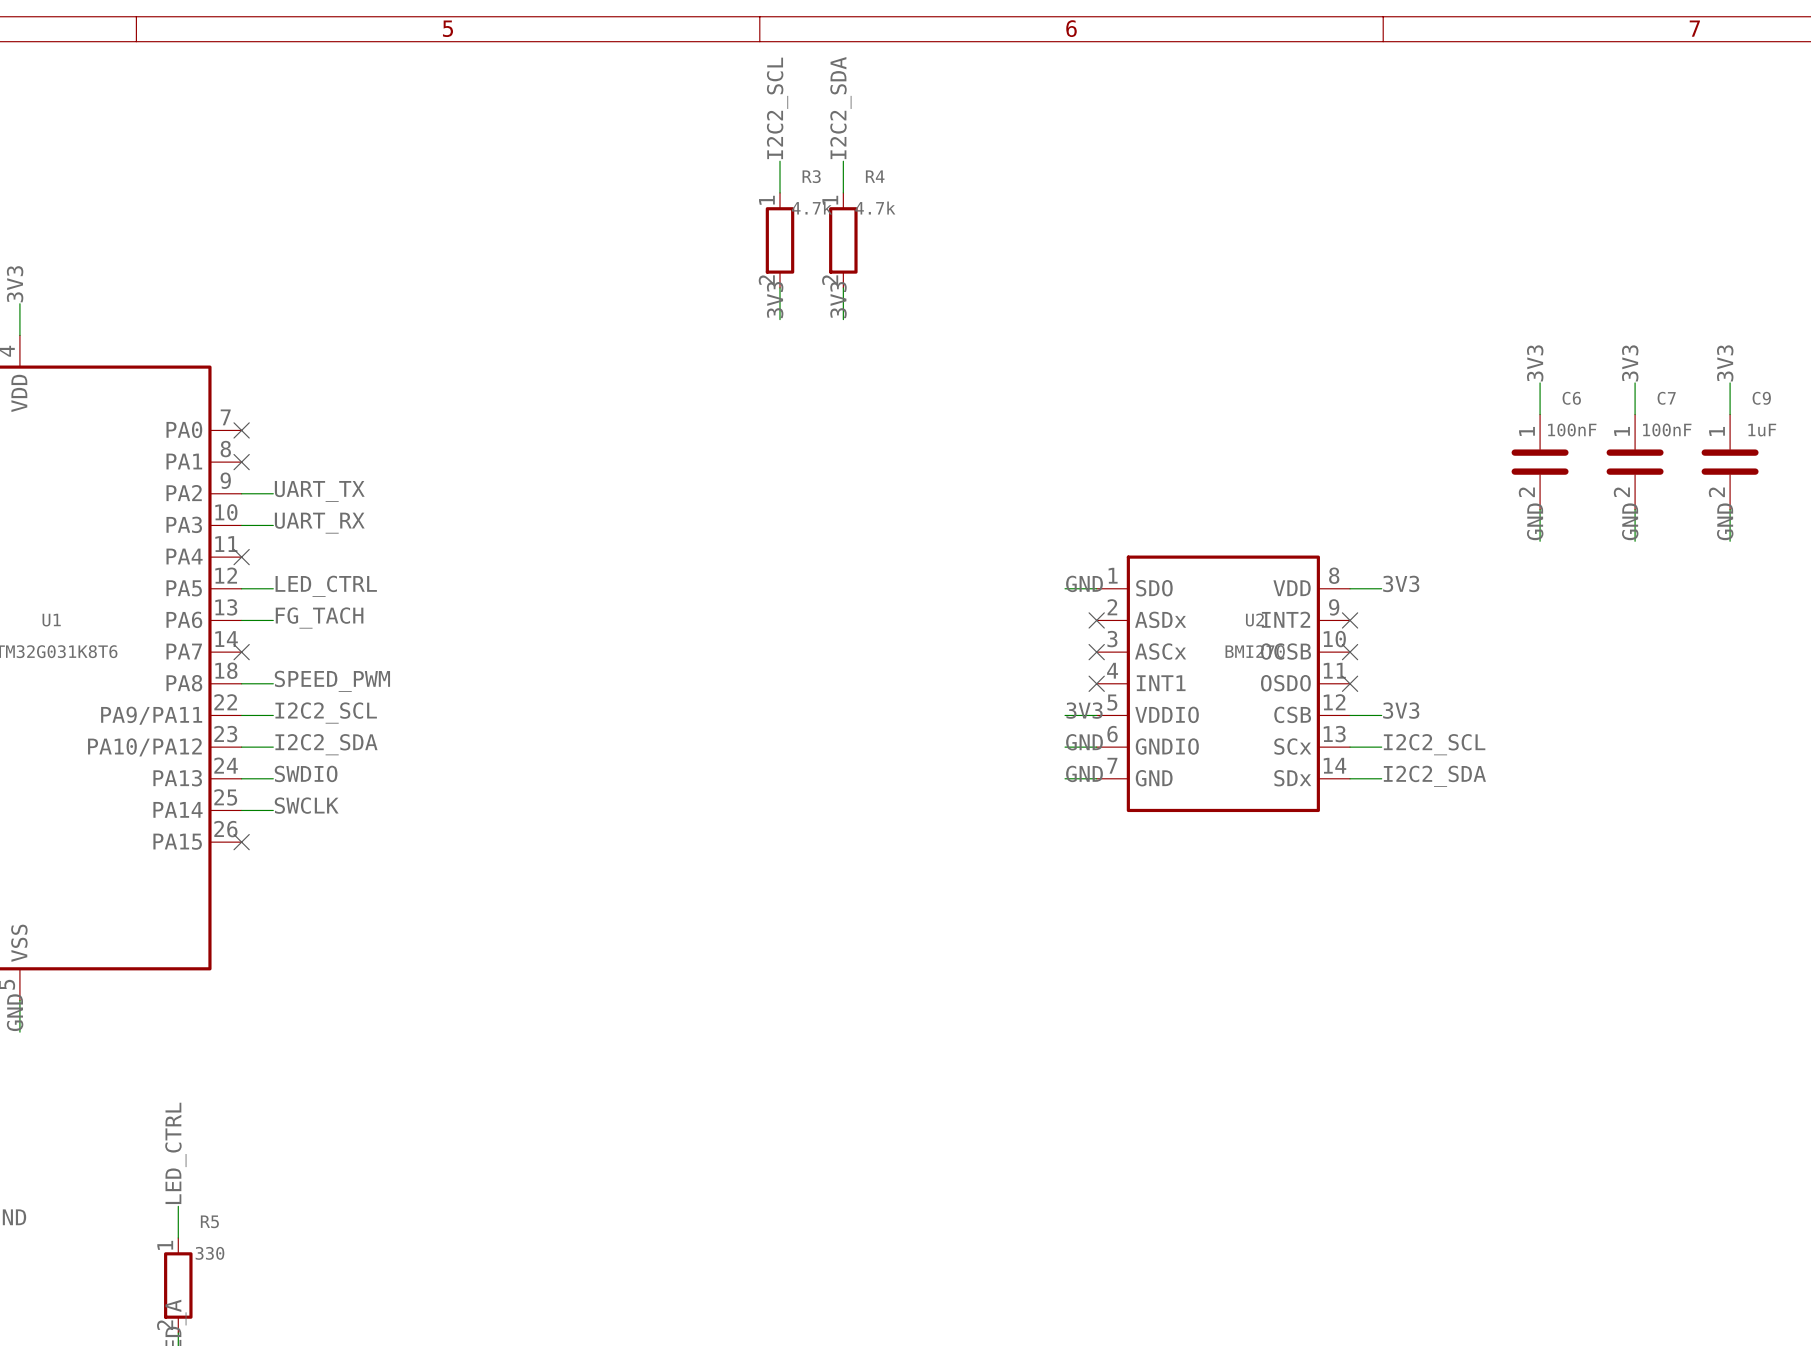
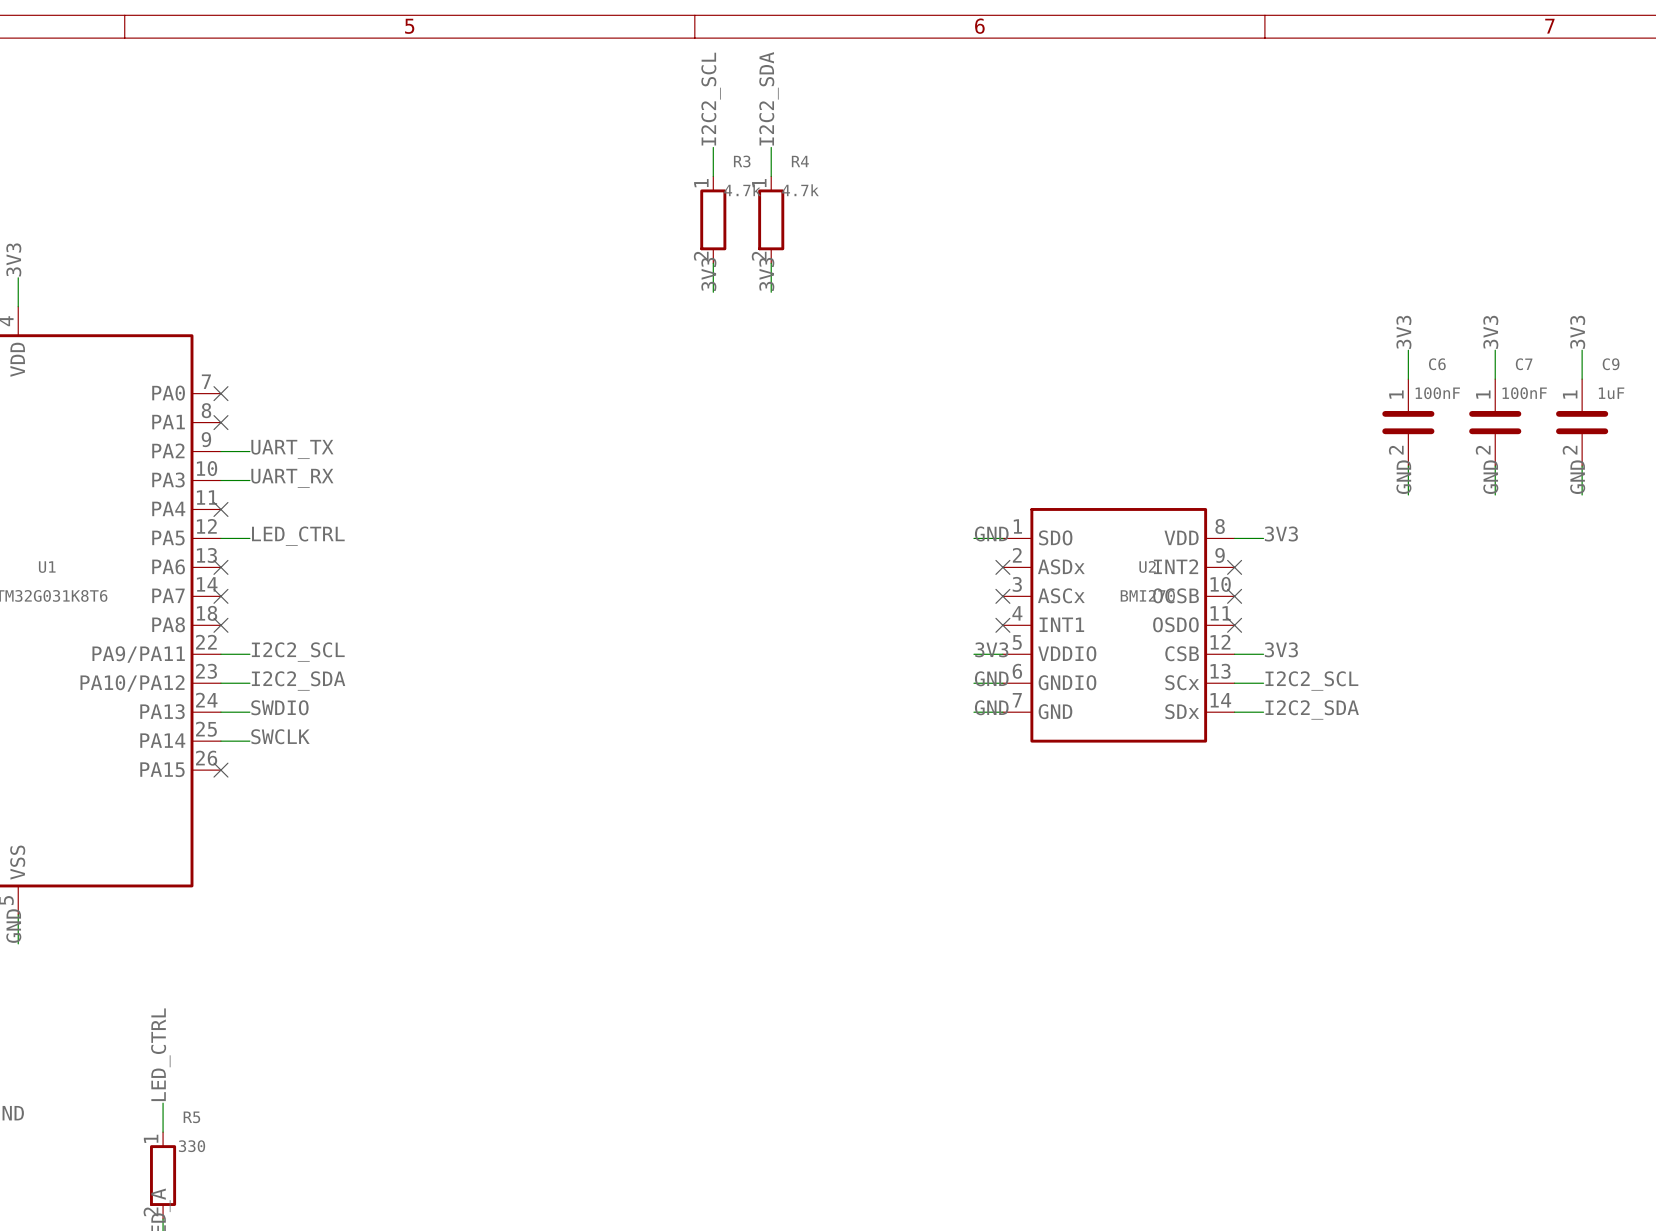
label: FG_TACH (319, 618) -> none
wire: (241, 620) (273, 620) -> none
no-connect mark: none -> (220, 567)
label: SPEED_PWM (332, 681) -> none
wire: (241, 683) (273, 683) -> none
no-connect mark: none -> (220, 625)

